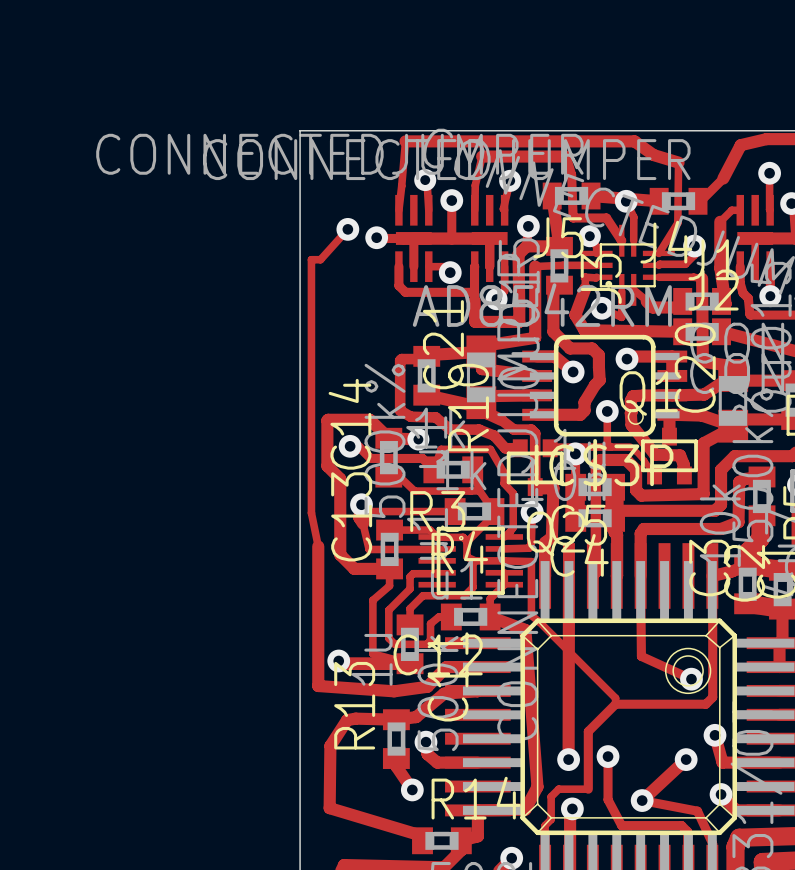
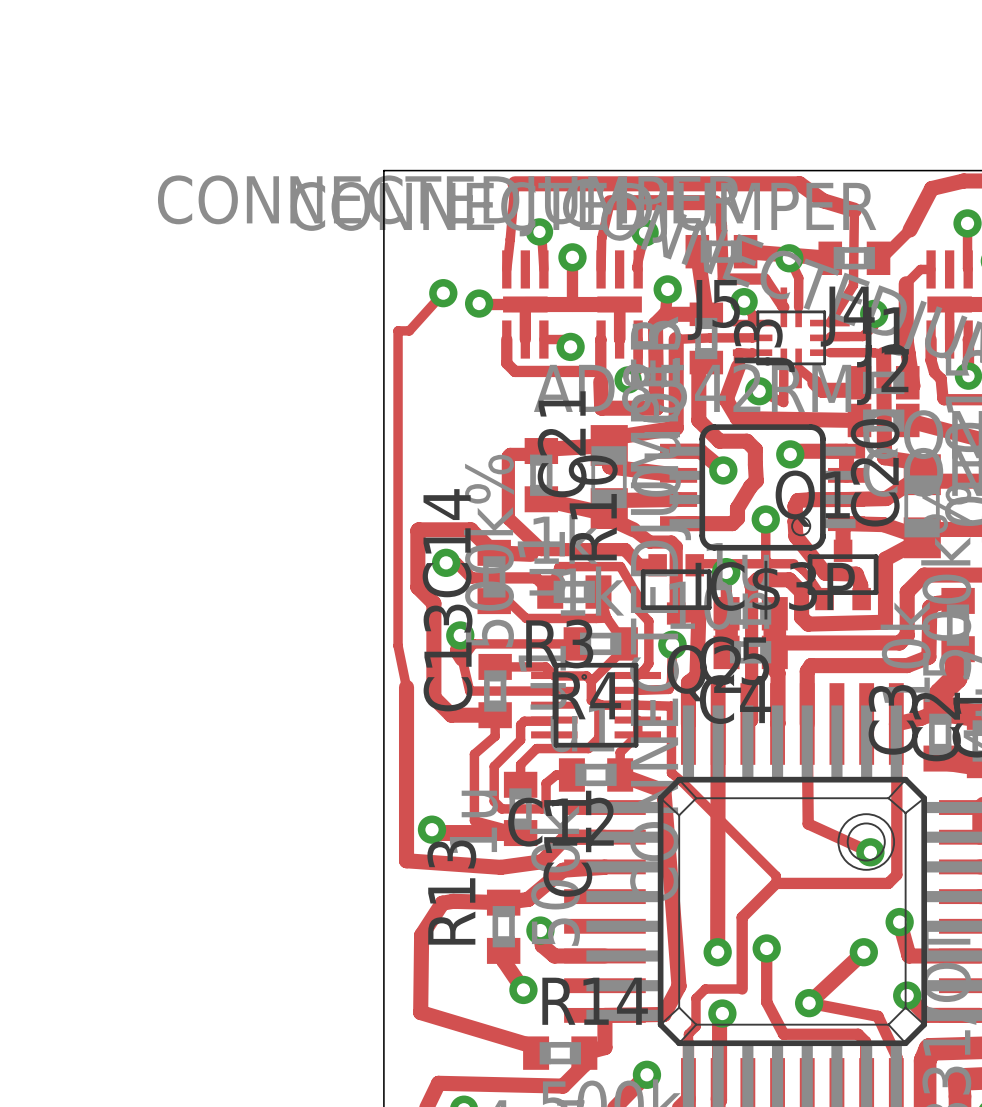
track: (400, 410) (410, 416) (435, 417) (450, 429) (479, 429) (494, 435) -> (508, 518) (541, 549) (625, 549)
via: (418, 439) -> none

